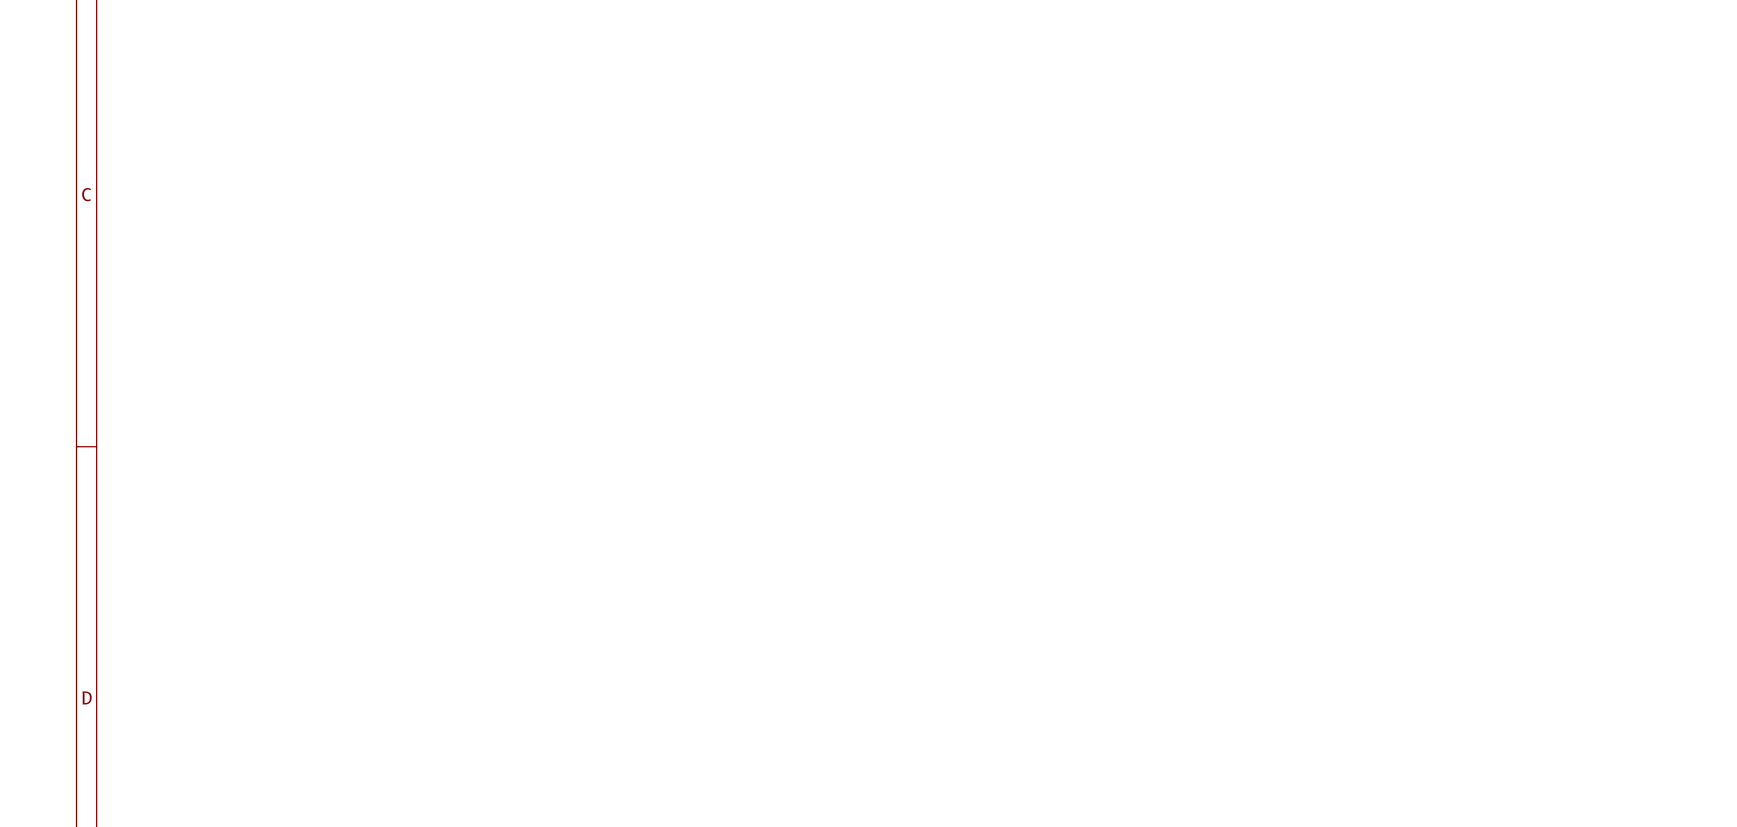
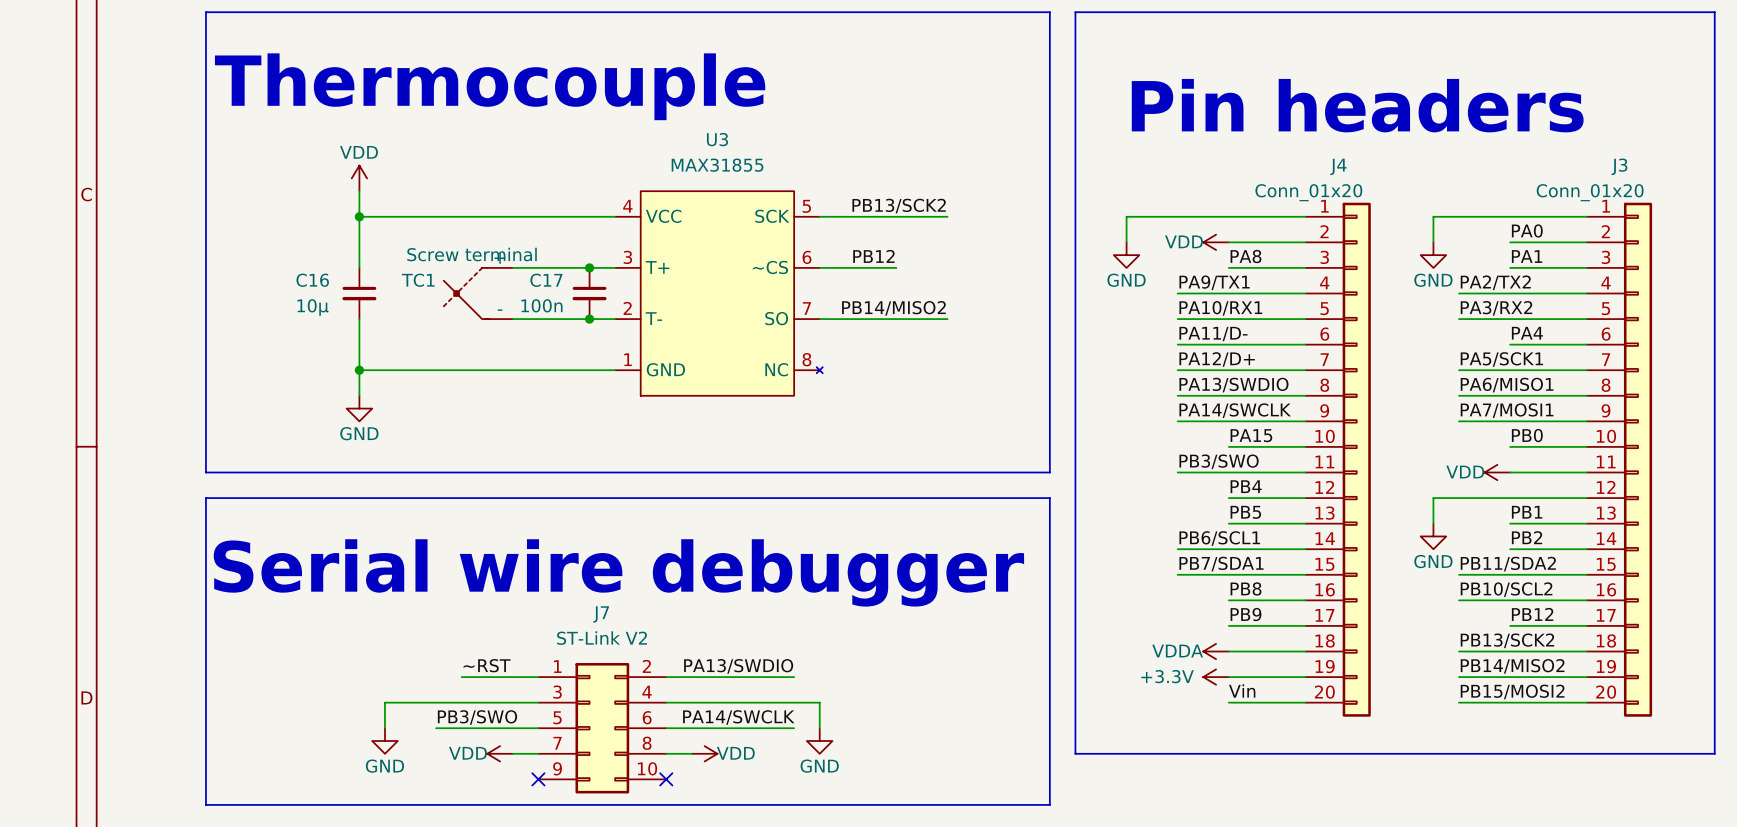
line: none -> (205, 12) (1049, 12) (1049, 472) (205, 472) (205, 12)
line: none -> (1075, 12) (1714, 12) (1714, 753) (1075, 753) (1075, 12)
text: none -> Thermocouple (490, 86)
text: none -> Pin headers (1357, 105)
power symbol: none -> VDD (359, 178)
wire: none -> (359, 191) (359, 267)
label: none -> PB13/SCK2 (899, 206)
wire: none -> (359, 216) (615, 216)
junction: none -> (359, 216)
wire: none -> (819, 216) (947, 216)
wire: none -> (1305, 216) (1126, 216) (1126, 242)
wire: none -> (1586, 216) (1433, 216) (1433, 242)
label: none -> PA0 (1527, 230)
power symbol: none -> VDD (1216, 242)
wire: none -> (1228, 242) (1305, 242)
wire: none -> (1510, 242) (1586, 242)
power symbol: none -> GND (1126, 255)
power symbol: none -> GND (1433, 255)
label: none -> PB12 (873, 256)
label: none -> PA8 (1245, 256)
label: none -> PA1 (1527, 256)
wire: none -> (512, 267) (615, 267)
junction: none -> (589, 267)
wire: none -> (819, 267) (896, 267)
wire: none -> (1228, 267) (1305, 267)
wire: none -> (1510, 267) (1586, 267)
label: none -> PA9/TX1 (1214, 282)
label: none -> PA2/TX2 (1495, 282)
C16: none -> 10µ (359, 293)
TC1: none -> Screw terminal (478, 293)
C17: none -> 100n (589, 293)
U3: none -> MAX31855 (718, 293)
wire: none -> (1177, 293) (1305, 293)
wire: none -> (1459, 293) (1586, 293)
label: none -> PB14/MISO2 (893, 308)
label: none -> PA10/RX1 (1220, 308)
label: none -> PA3/RX2 (1496, 308)
wire: none -> (359, 319) (359, 395)
wire: none -> (512, 319) (615, 319)
junction: none -> (589, 319)
wire: none -> (819, 319) (947, 319)
wire: none -> (1177, 319) (1305, 319)
wire: none -> (1459, 319) (1586, 319)
label: none -> PA11/D- (1213, 334)
label: none -> PA4 (1527, 333)
wire: none -> (1177, 344) (1305, 344)
wire: none -> (1510, 344) (1586, 344)
label: none -> PA12/D+ (1217, 359)
label: none -> PA5/SCK1 (1501, 359)
wire: none -> (359, 370) (615, 370)
junction: none -> (359, 370)
wire: none -> (1177, 370) (1305, 370)
wire: none -> (1459, 370) (1586, 370)
label: none -> PA13/SWDIO (1233, 385)
label: none -> PA6/MISO1 (1507, 385)
wire: none -> (1177, 395) (1305, 395)
wire: none -> (1459, 395) (1586, 395)
power symbol: none -> GND (359, 408)
label: none -> PA14/SWCLK (1235, 410)
label: none -> PA7/MOSI1 (1507, 410)
wire: none -> (1177, 421) (1305, 421)
wire: none -> (1459, 421) (1586, 421)
label: none -> PA15 (1251, 435)
label: none -> PB0 (1527, 435)
wire: none -> (1228, 446) (1305, 446)
wire: none -> (1510, 446) (1586, 446)
J4: none -> Conn_01x20 (1338, 459)
J3: none -> Conn_01x20 (1619, 459)
label: none -> PB3/SWO (1219, 461)
wire: none -> (1177, 472) (1305, 472)
power symbol: none -> VDD (1497, 472)
wire: none -> (1510, 472) (1586, 472)
label: none -> PB4 (1246, 486)
line: none -> (205, 498) (205, 804) (1049, 804) (1049, 498) (205, 498)
wire: none -> (1228, 498) (1305, 498)
wire: none -> (1586, 498) (1433, 498) (1433, 523)
label: none -> PB5 (1245, 512)
label: none -> PB1 (1527, 512)
wire: none -> (1228, 523) (1305, 523)
wire: none -> (1510, 523) (1586, 523)
power symbol: none -> GND (1433, 536)
label: none -> PB6/SCL1 (1219, 538)
label: none -> PB2 (1527, 537)
wire: none -> (1177, 549) (1305, 549)
wire: none -> (1510, 549) (1586, 549)
label: none -> PB7/SDA1 (1221, 564)
label: none -> PB11/SDA2 (1508, 564)
text: none -> Serial wire debugger (618, 572)
wire: none -> (1177, 574) (1305, 574)
wire: none -> (1459, 574) (1586, 574)
label: none -> PB8 (1246, 588)
label: none -> PB10/SCL2 (1506, 589)
wire: none -> (1228, 600) (1305, 600)
wire: none -> (1459, 600) (1586, 600)
label: none -> PB9 (1245, 614)
label: none -> PB12 (1532, 614)
wire: none -> (1228, 625) (1305, 625)
wire: none -> (1510, 625) (1586, 625)
label: none -> PB13/SCK2 (1507, 640)
power symbol: none -> VDDA (1216, 651)
wire: none -> (1228, 651) (1305, 651)
wire: none -> (1459, 651) (1586, 651)
label: none -> ~RST (487, 665)
label: none -> PA13/SWDIO (738, 666)
label: none -> PB14/MISO2 (1512, 666)
wire: none -> (461, 677) (538, 677)
wire: none -> (666, 677) (794, 677)
power symbol: none -> +3.3V (1216, 677)
wire: none -> (1228, 677) (1305, 677)
wire: none -> (1459, 677) (1586, 677)
label: none -> Vin (1242, 690)
label: none -> PB15/MOSI2 (1512, 691)
wire: none -> (538, 702) (384, 702) (384, 728)
wire: none -> (666, 702) (819, 702) (819, 728)
wire: none -> (1228, 702) (1305, 702)
wire: none -> (1459, 702) (1586, 702)
label: none -> PB3/SWO (477, 717)
label: none -> PA14/SWCLK (738, 717)
wire: none -> (436, 728) (538, 728)
J7: none -> ST-Link V2 (602, 728)
wire: none -> (666, 728) (794, 728)
power symbol: none -> GND (384, 741)
power symbol: none -> GND (819, 741)
power symbol: none -> VDD (500, 753)
wire: none -> (512, 753) (538, 753)
wire: none -> (666, 753) (691, 753)
power symbol: none -> VDD (704, 753)
no-connect mark: none -> (538, 779)
no-connect mark: none -> (666, 779)

